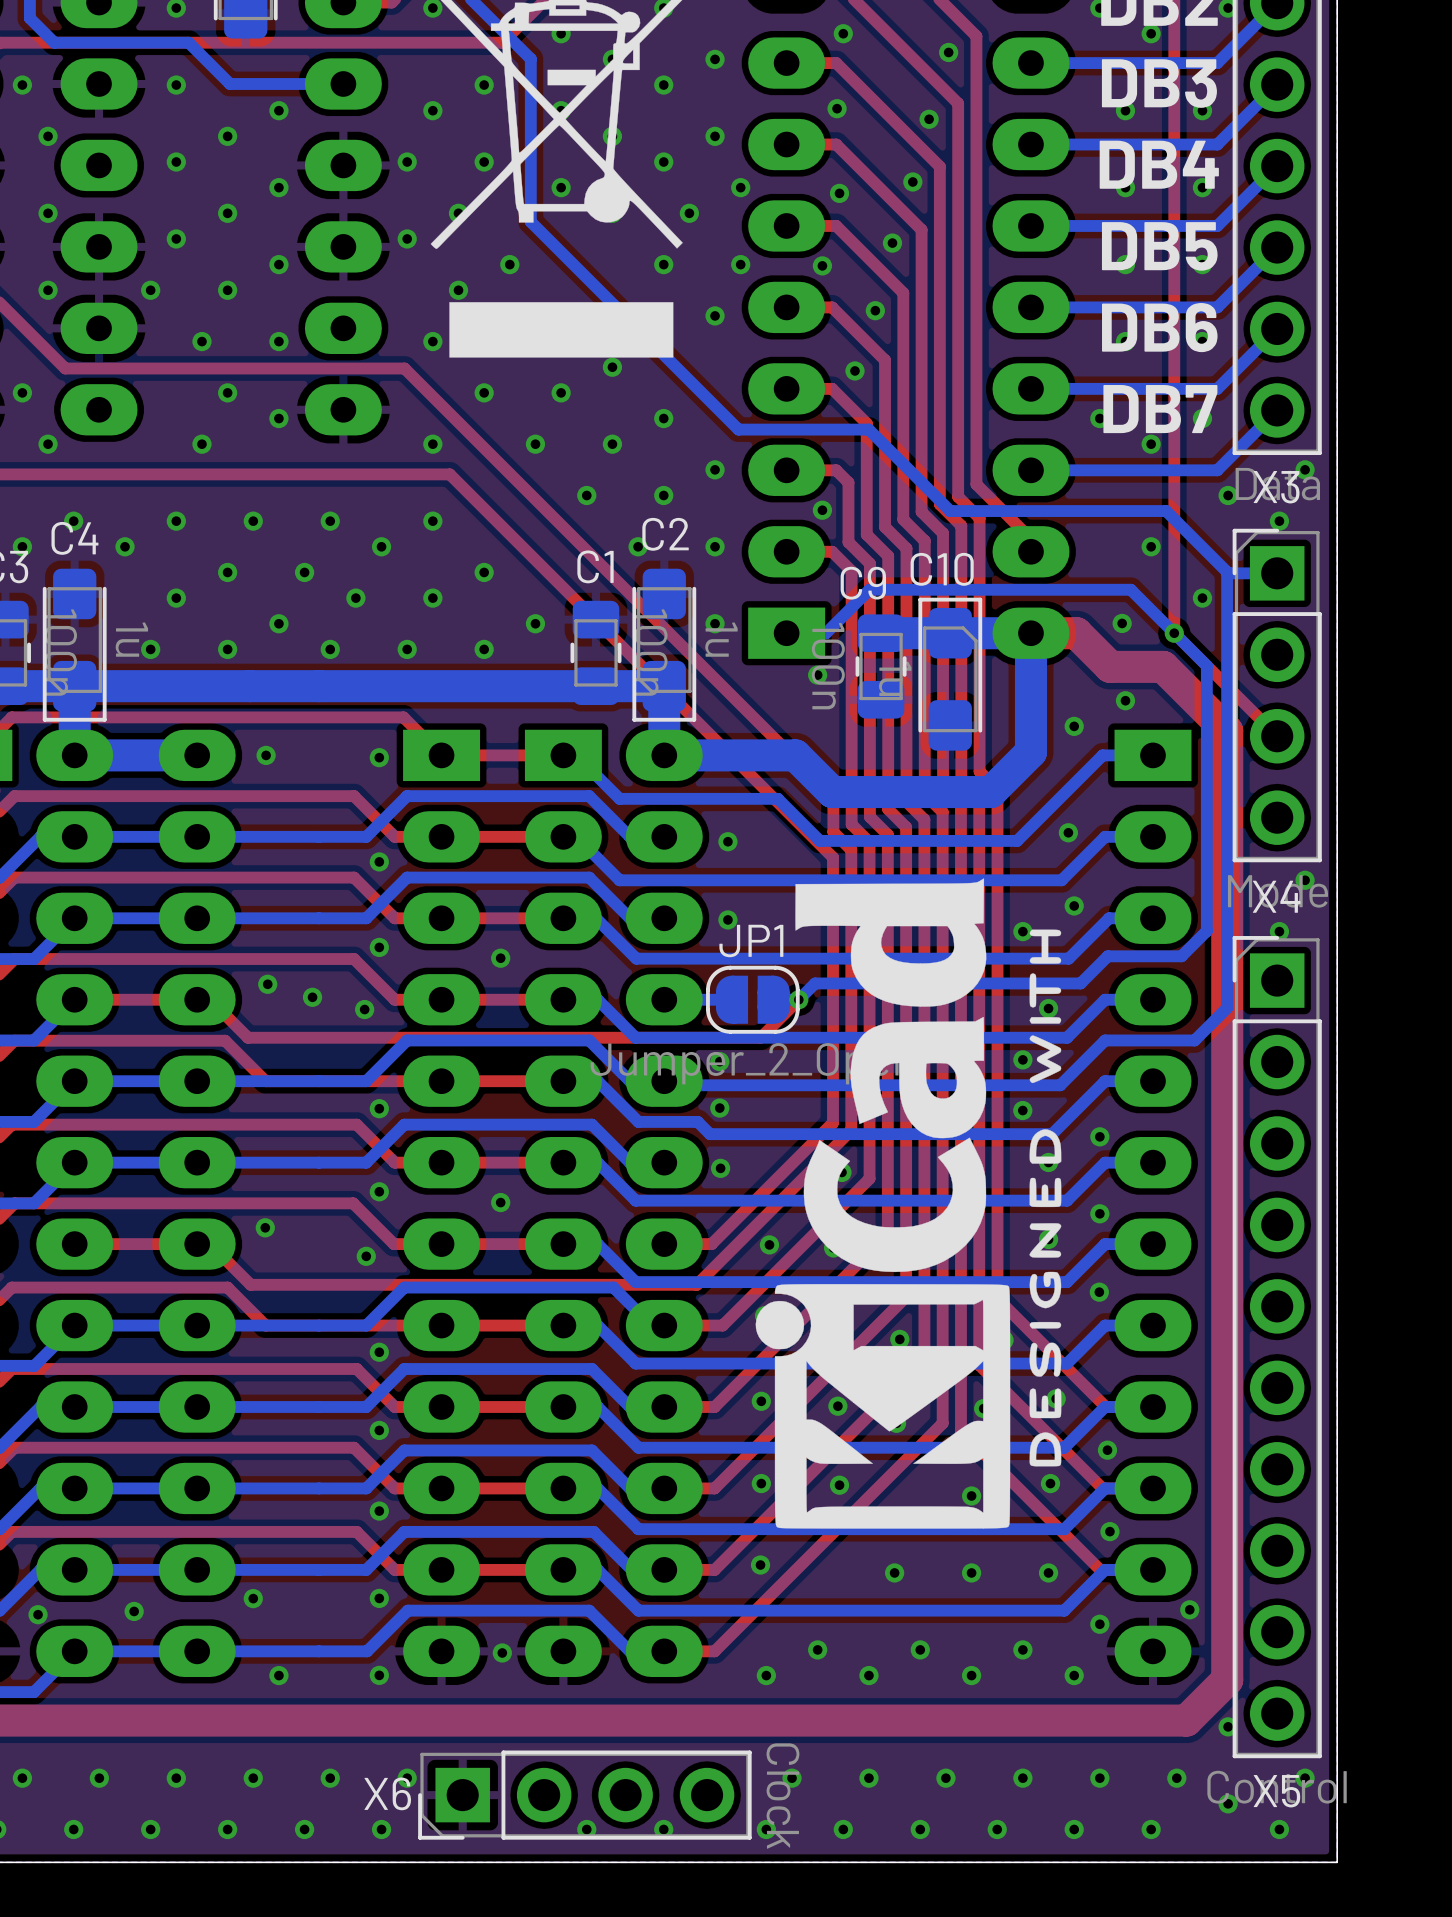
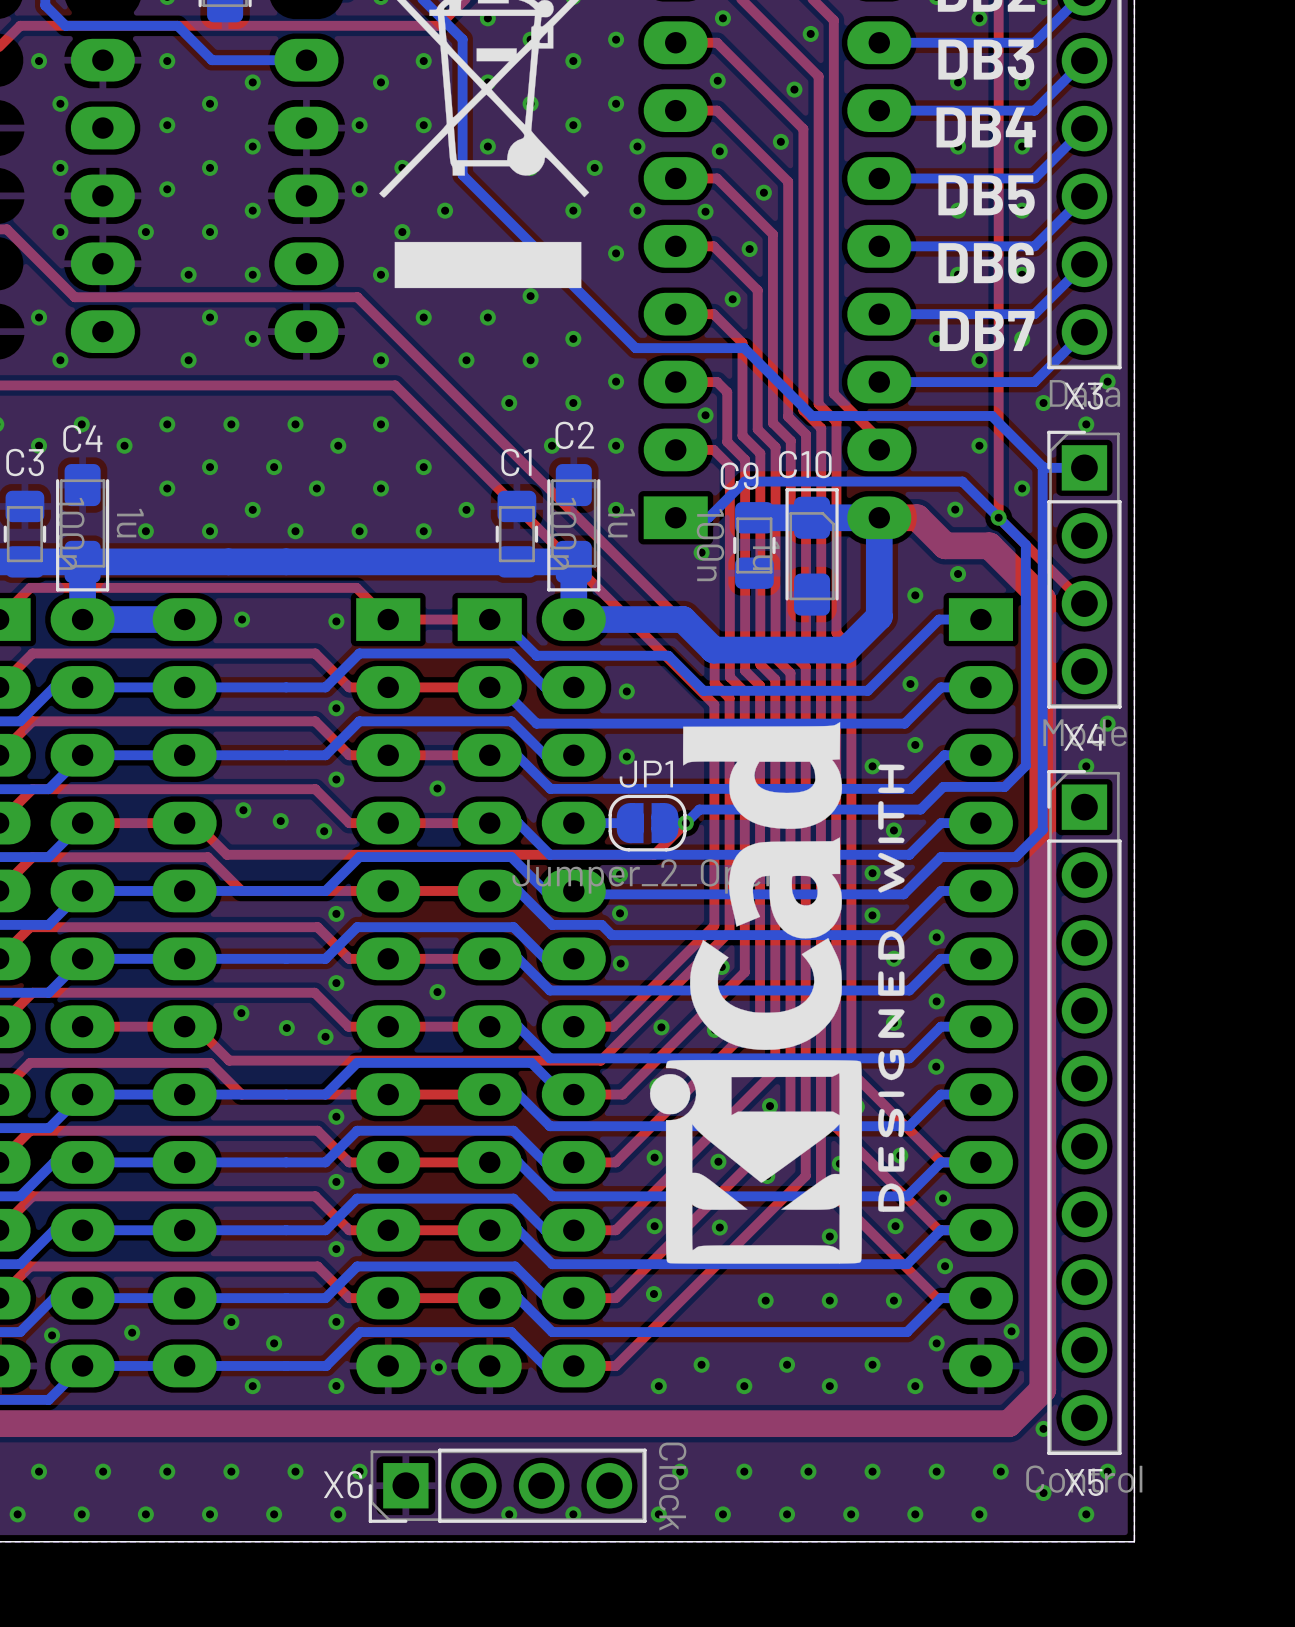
via: none -> (286, 1028)
via: none -> (274, 1343)

